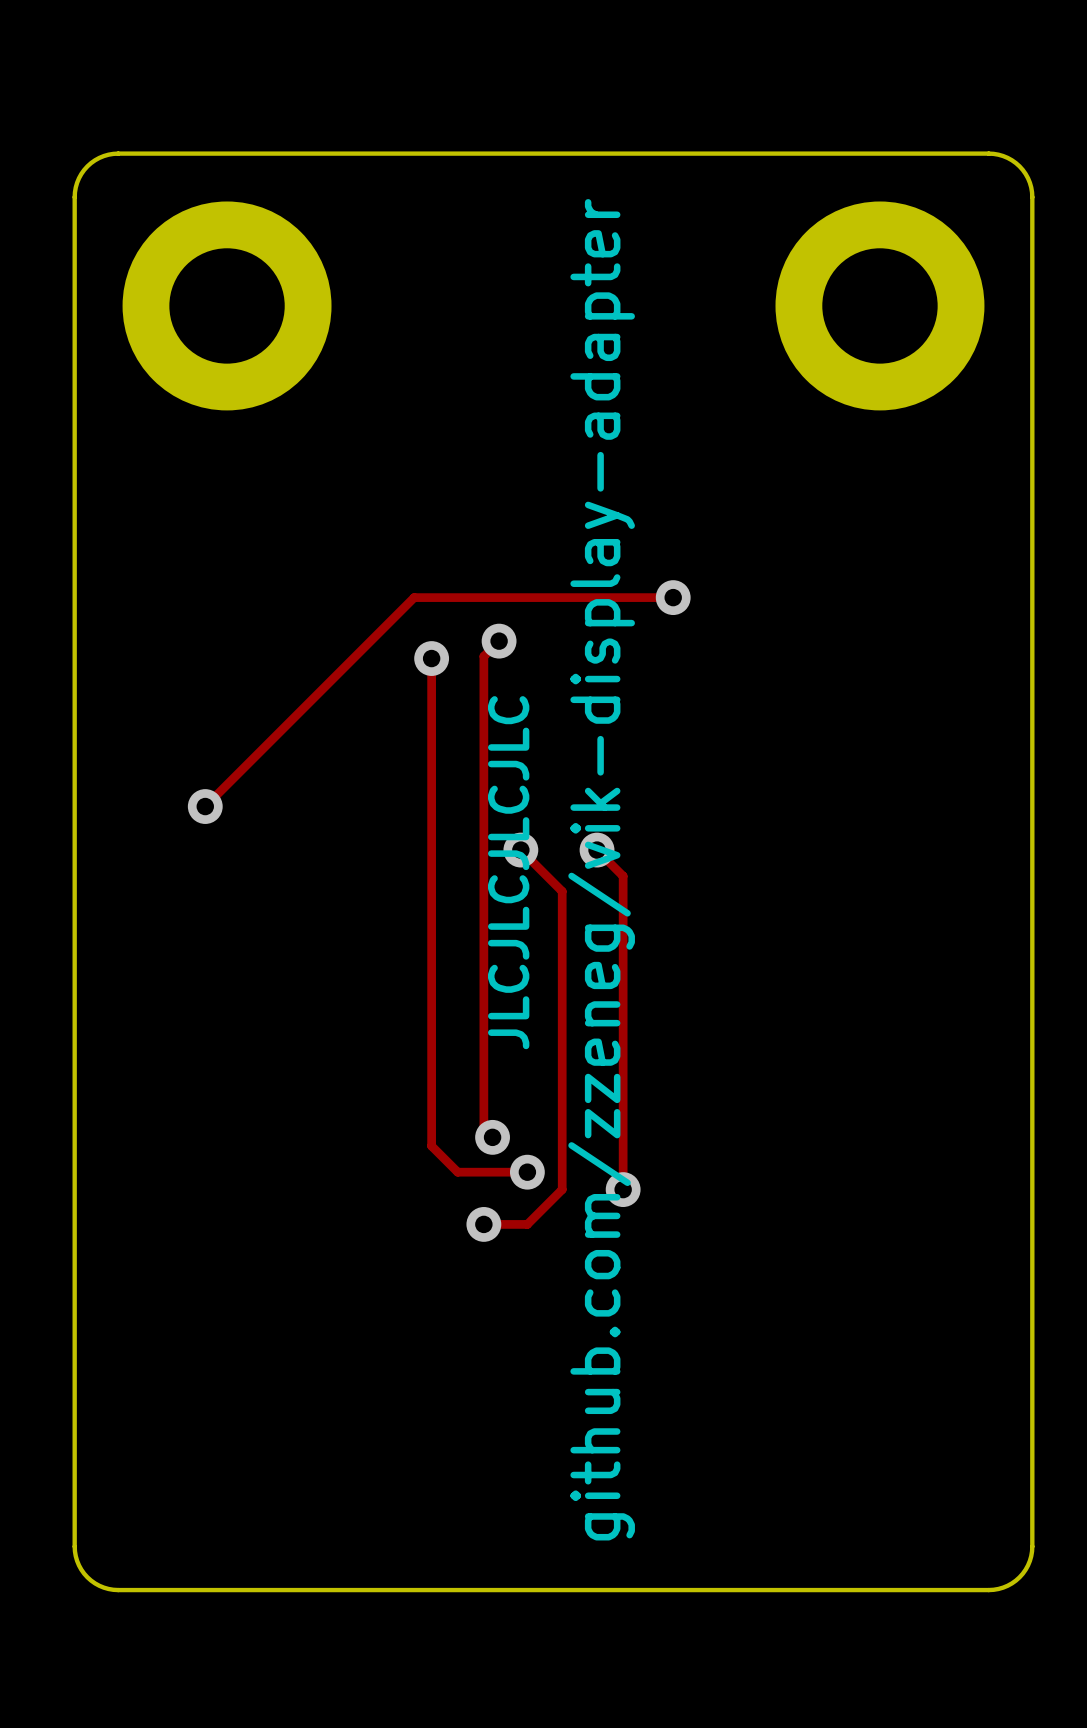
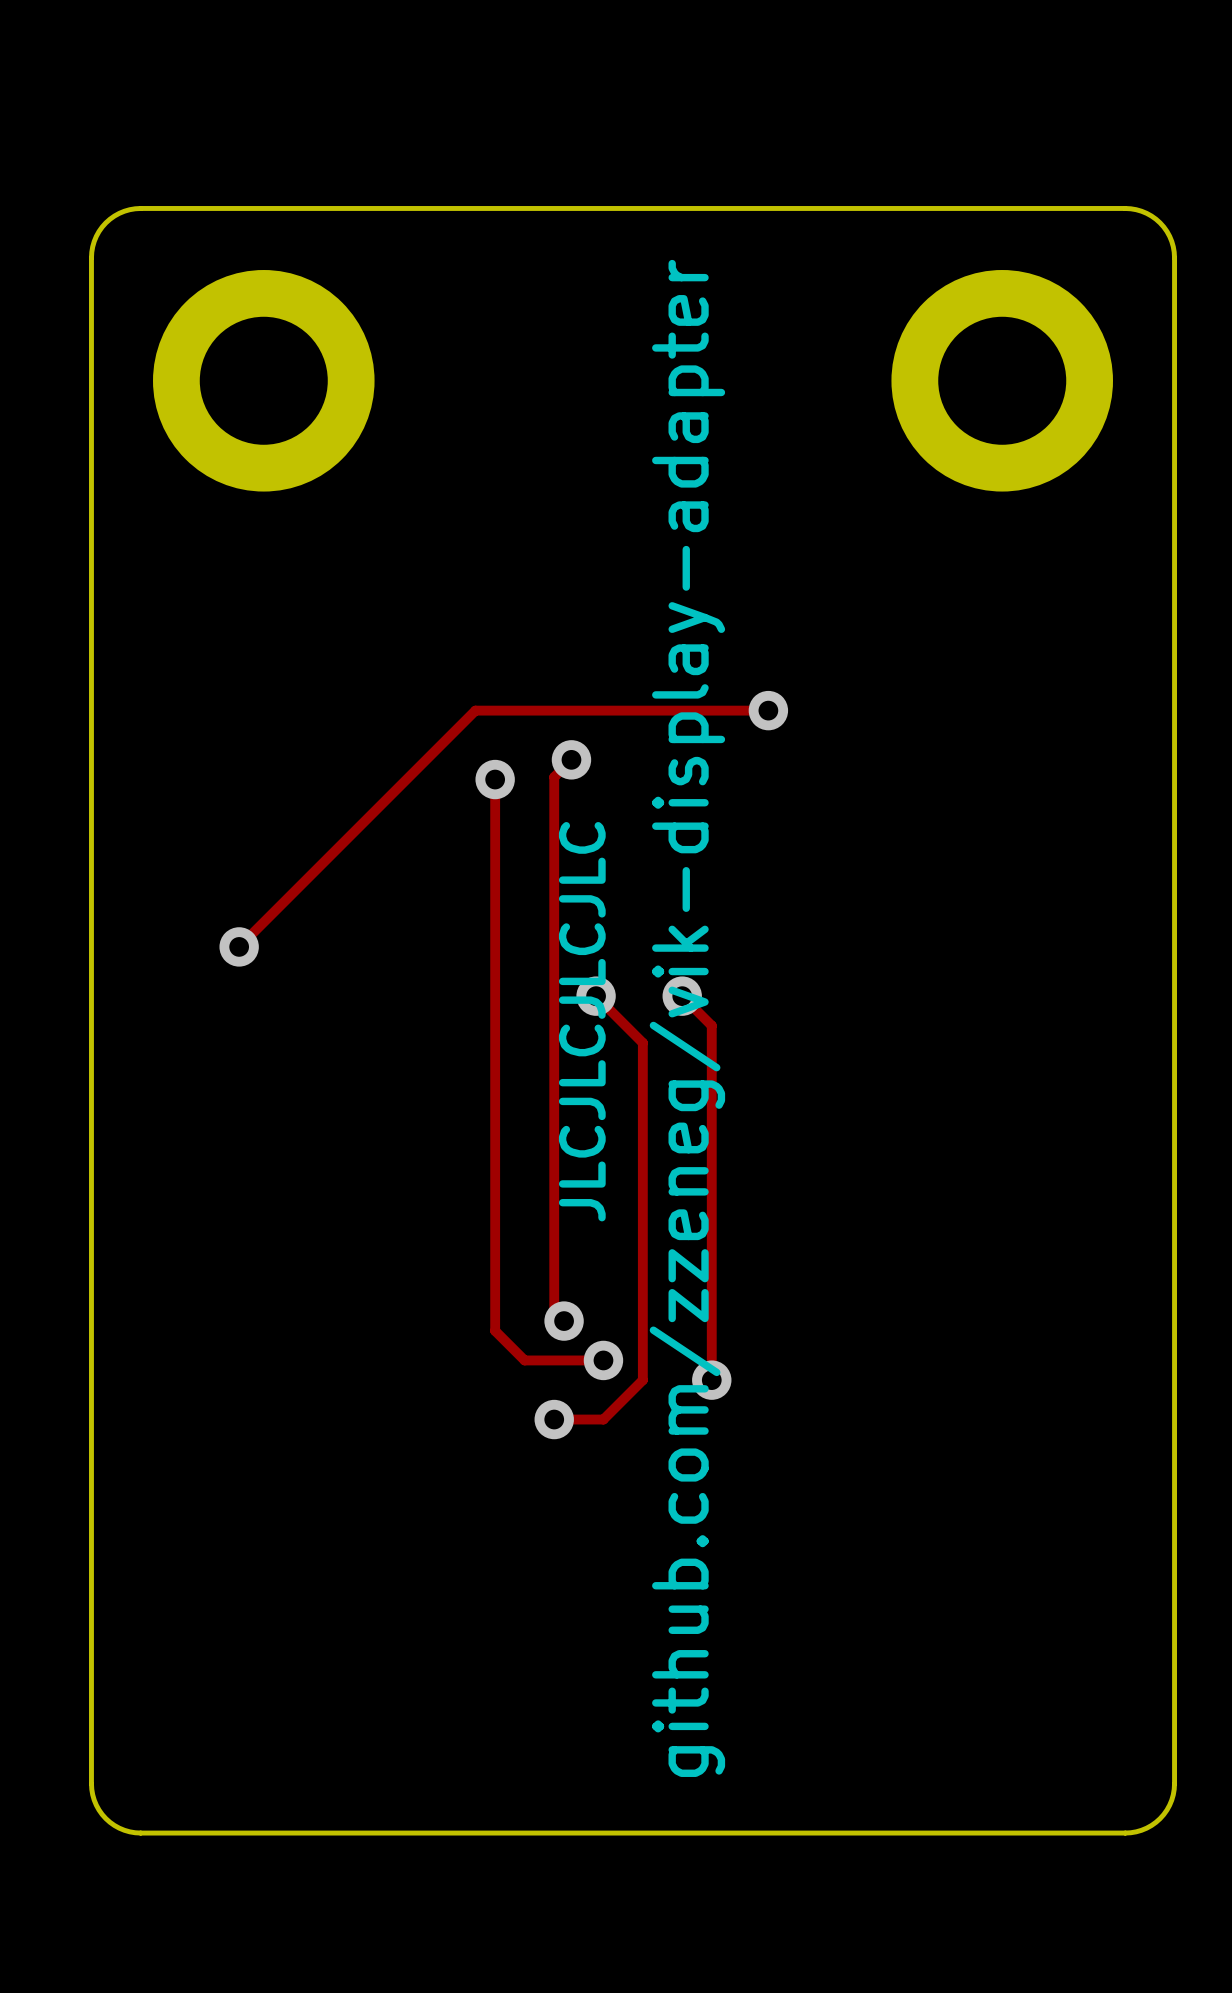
part footprint: [122, 201, 332, 411] -> [153, 270, 375, 492]
part footprint: [775, 201, 985, 411] -> [891, 270, 1114, 492]

